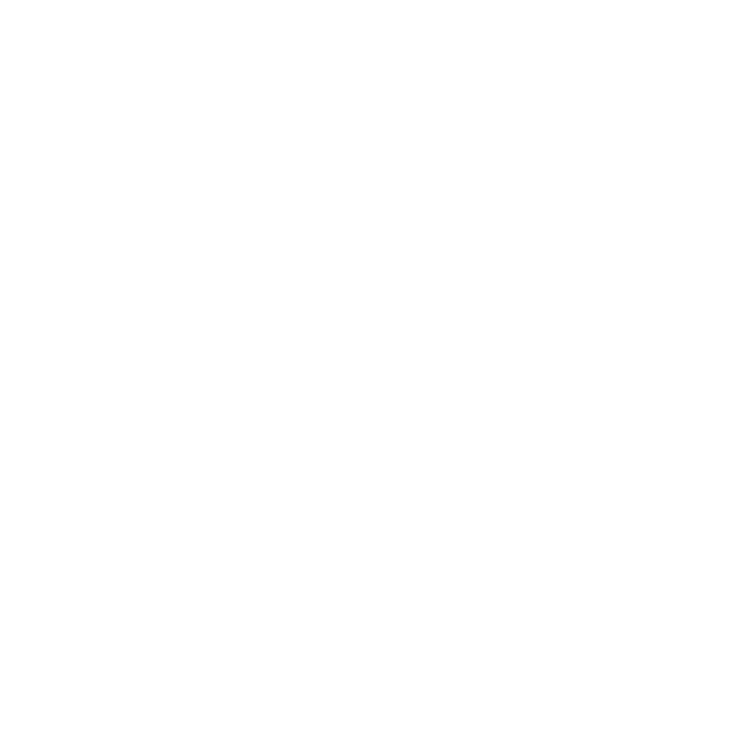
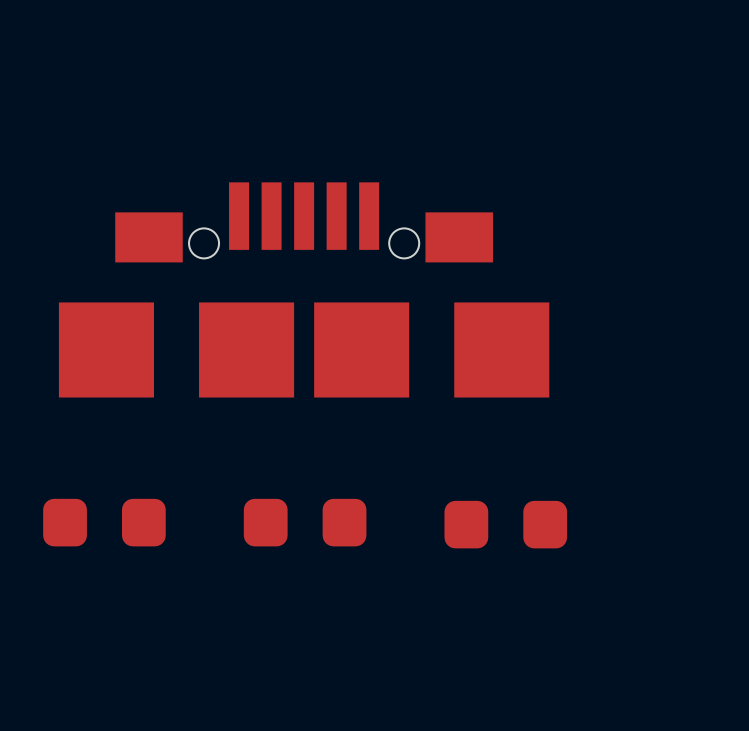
part: none -> (304, 289)
part: none -> (104, 522)
part: none -> (305, 522)
part: none -> (505, 524)

